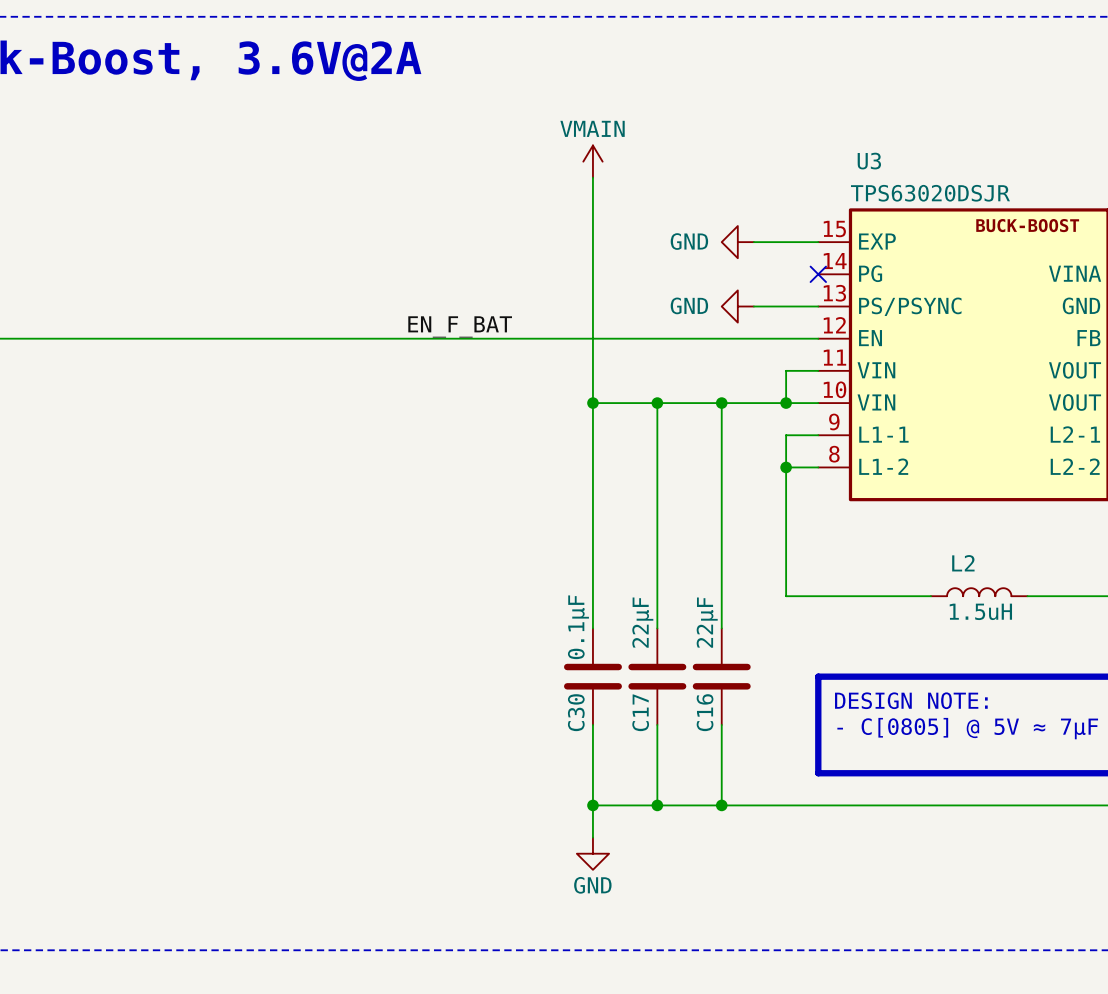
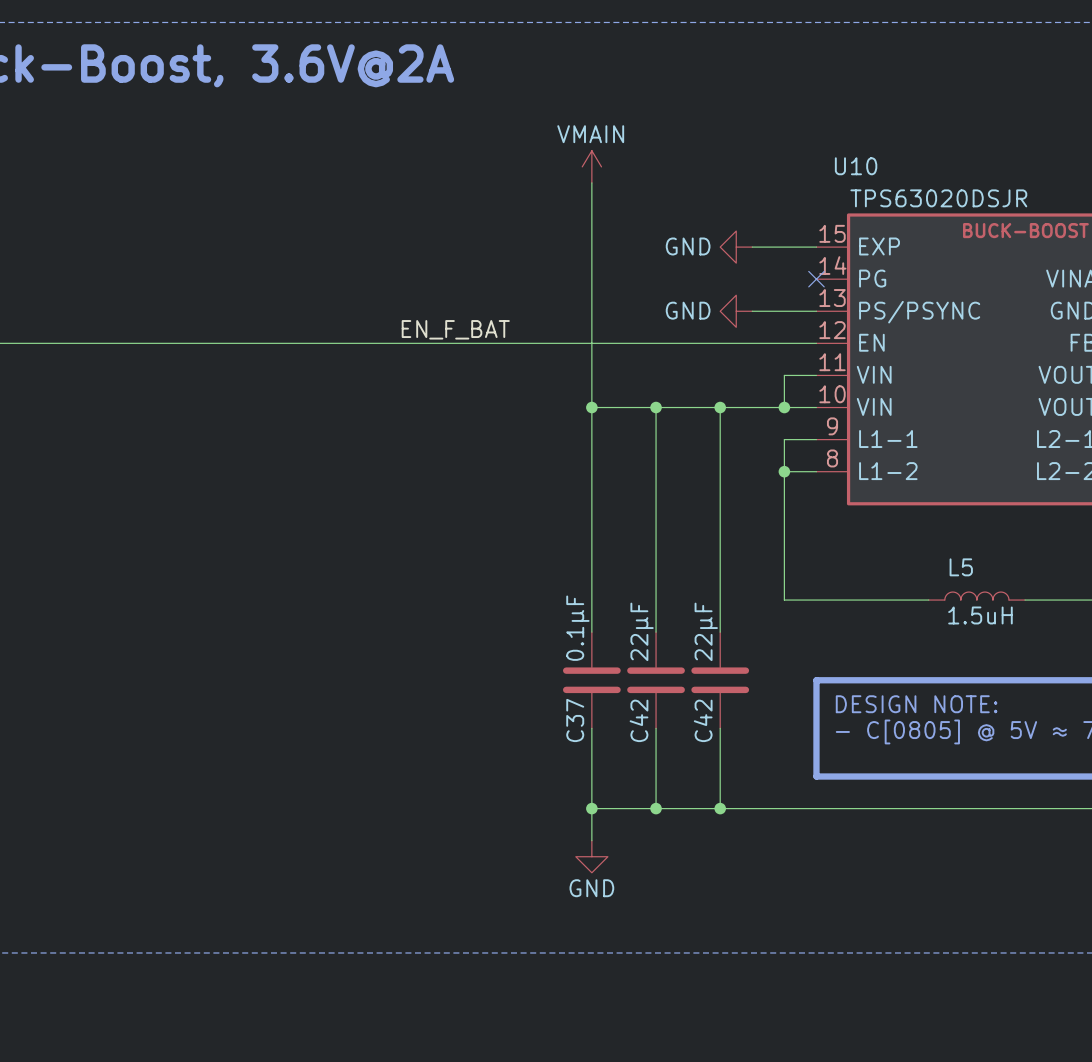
U3 name: U3 (869, 161) -> U10 (856, 166)
L2 name: L2 (963, 563) -> L5 (961, 567)
C30 name: C30 (576, 712) -> C37 (575, 720)
C17 name: C17 (640, 712) -> C42 (639, 720)
C16 name: C16 (705, 712) -> C42 (703, 720)

